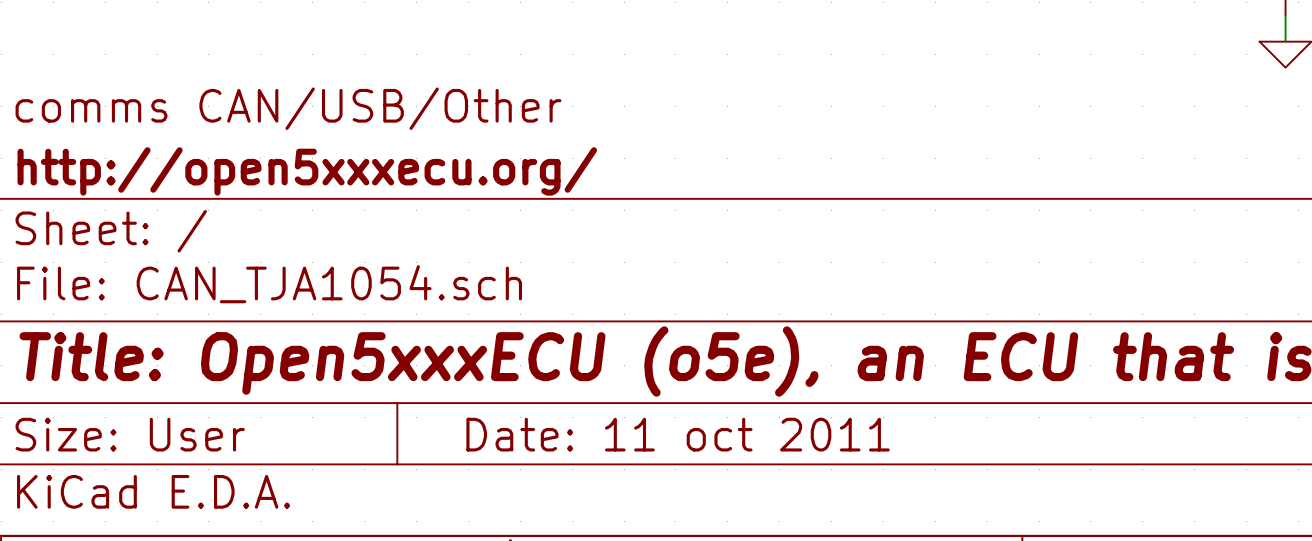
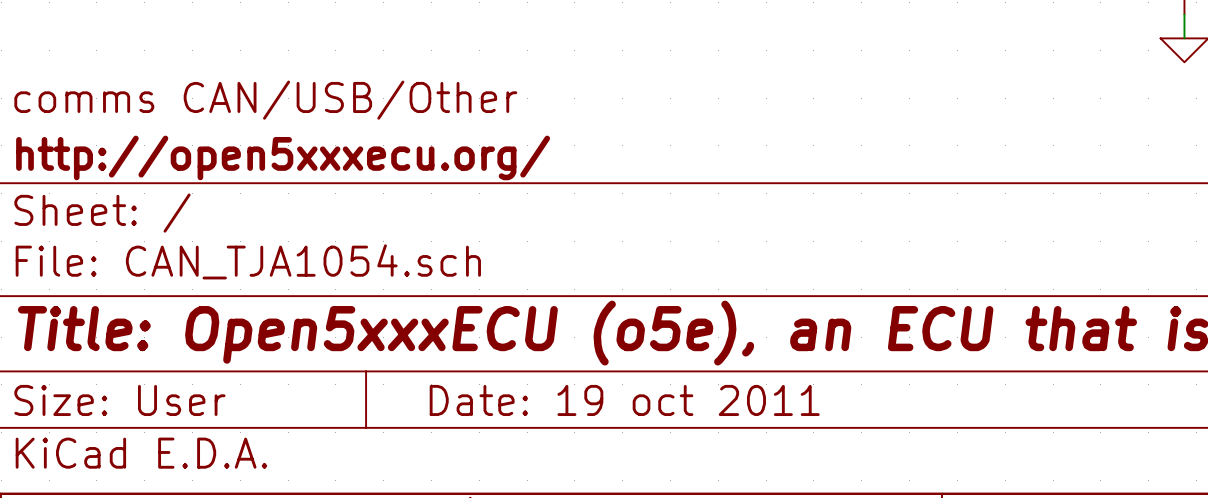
title block: Date: 11 oct 2011 (678, 434) -> Date: 19 oct 2011 (624, 400)

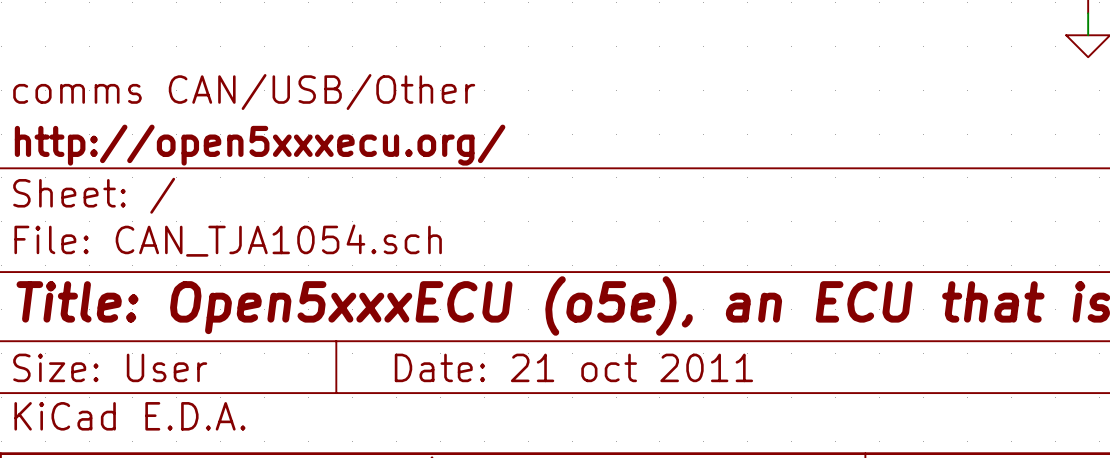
title block: Date: 19 oct 2011 (624, 400) -> Date: 21 oct 2011 (573, 367)

